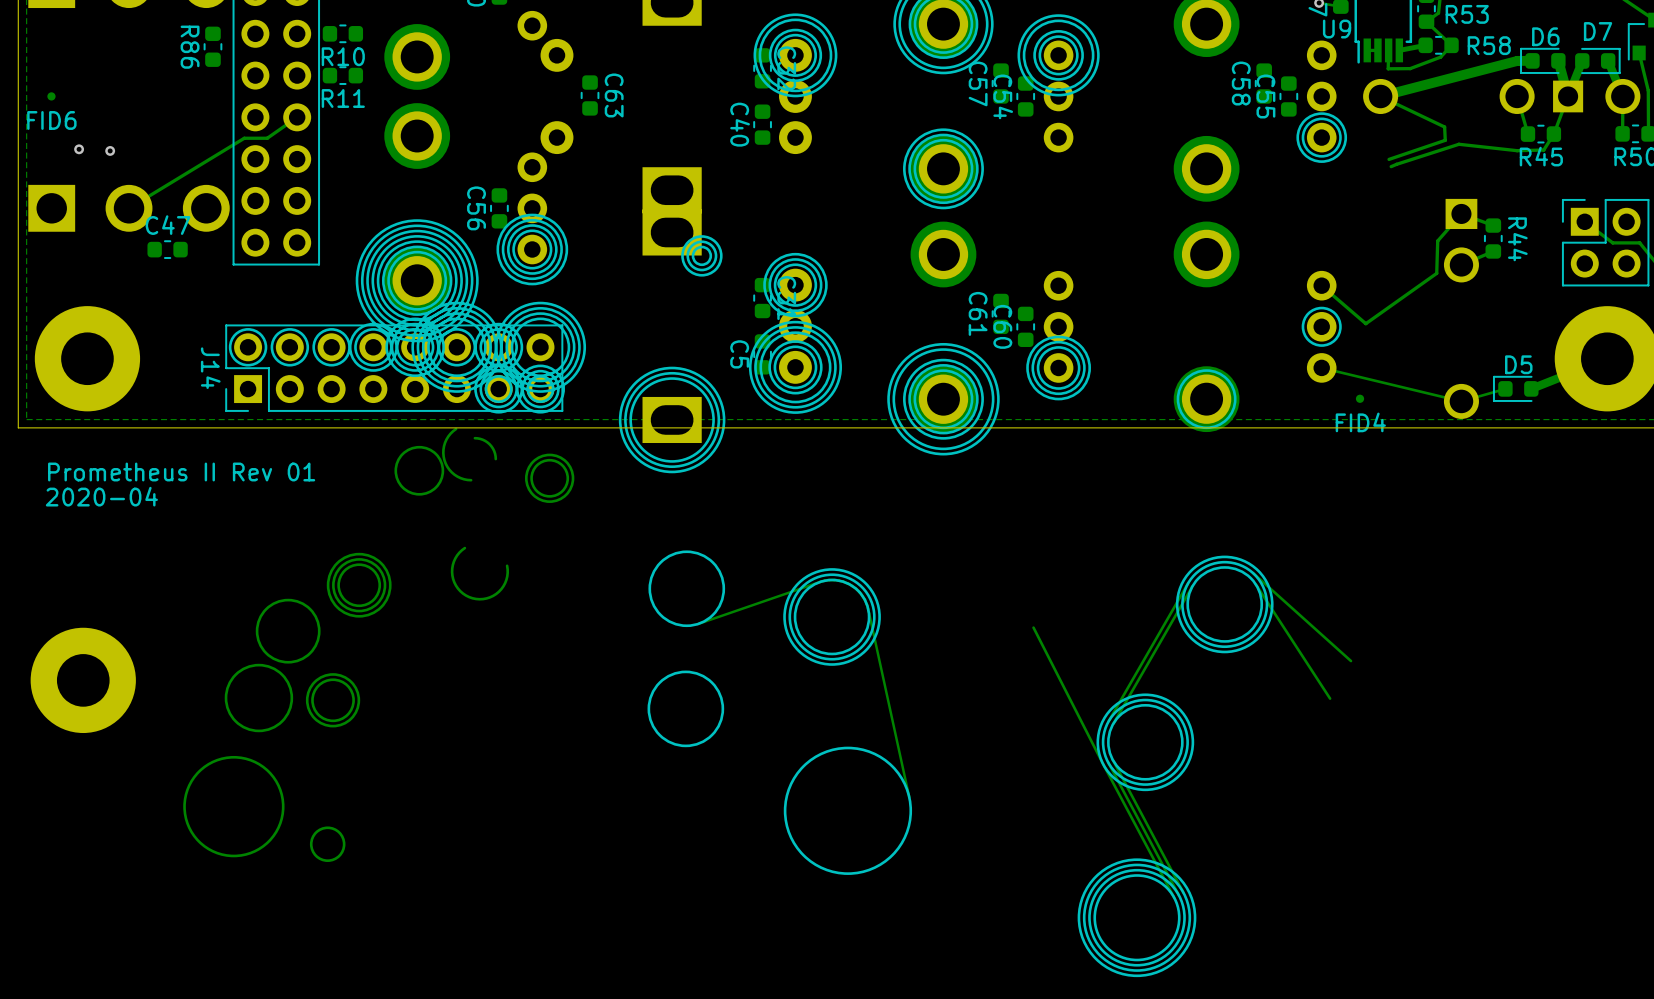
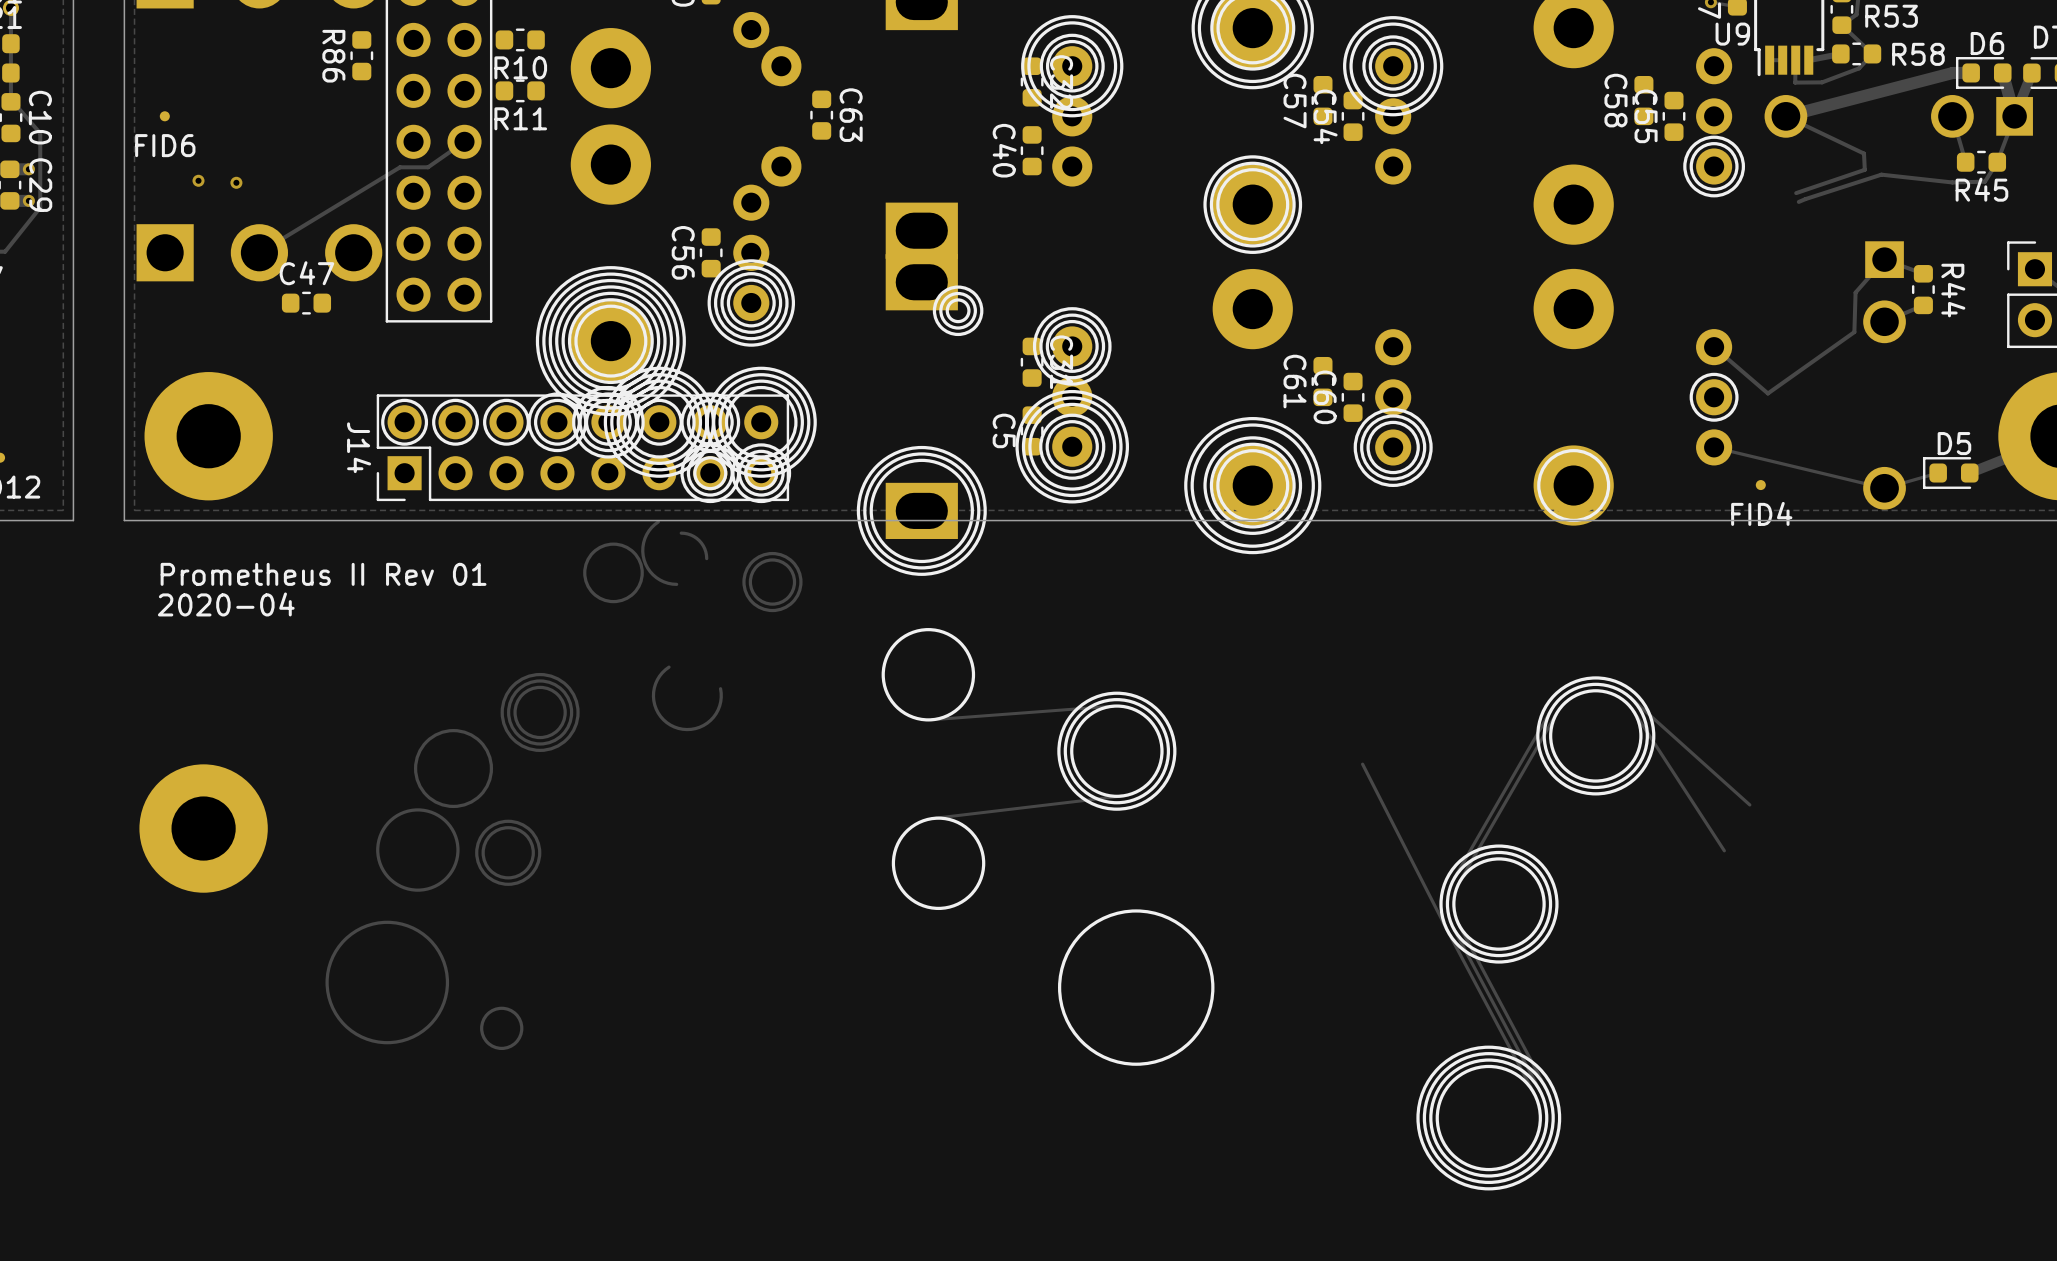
track: none -> (1113, 706) (931, 719)
drawing position: (686, 588) -> (928, 674)
track: (698, 623) (824, 580) (843, 581) (856, 588) (862, 595) (868, 609) (909, 797) -> none
track: none -> (1122, 796) (933, 818)

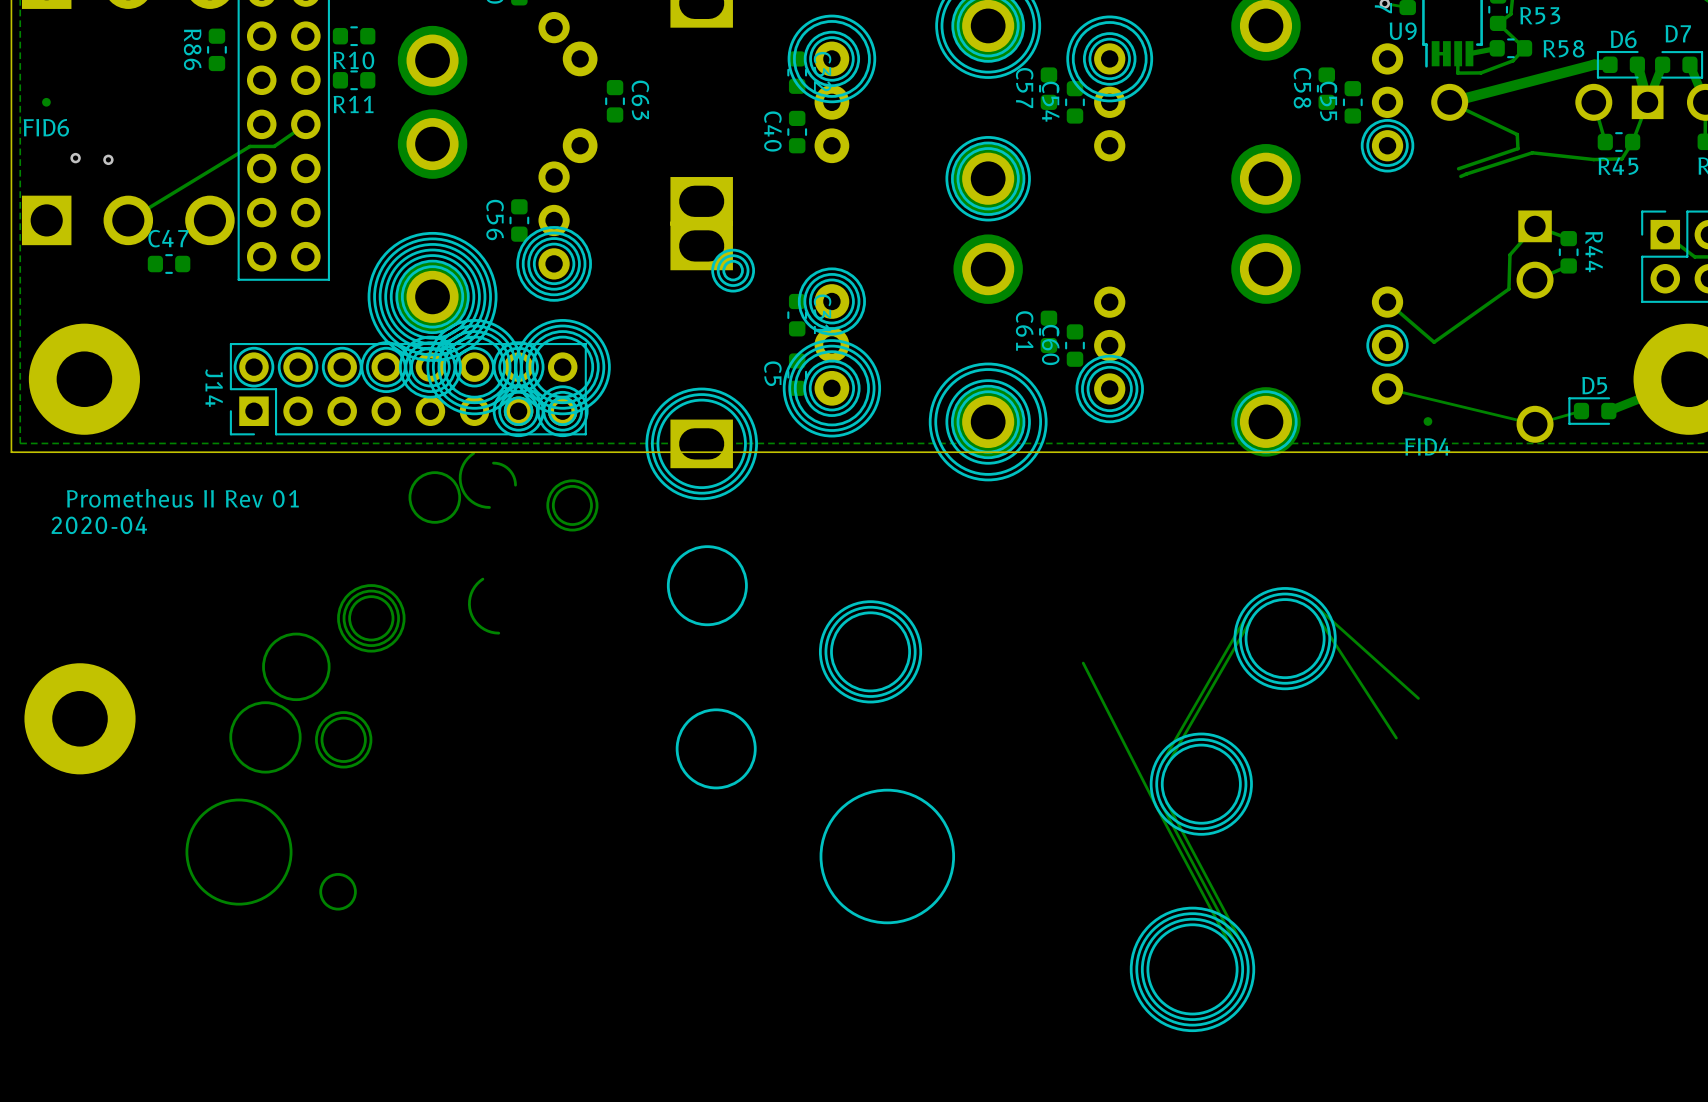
track: (669, 667) (657, 679) (653, 696) (656, 709) (660, 716) (674, 726) (691, 729) (707, 723) (713, 717) (719, 705) (720, 688) -> (482, 579) (471, 593) (470, 612) (481, 627) (498, 633)
track: (1113, 706) (931, 719) -> none
track: (1122, 796) (933, 818) -> none

